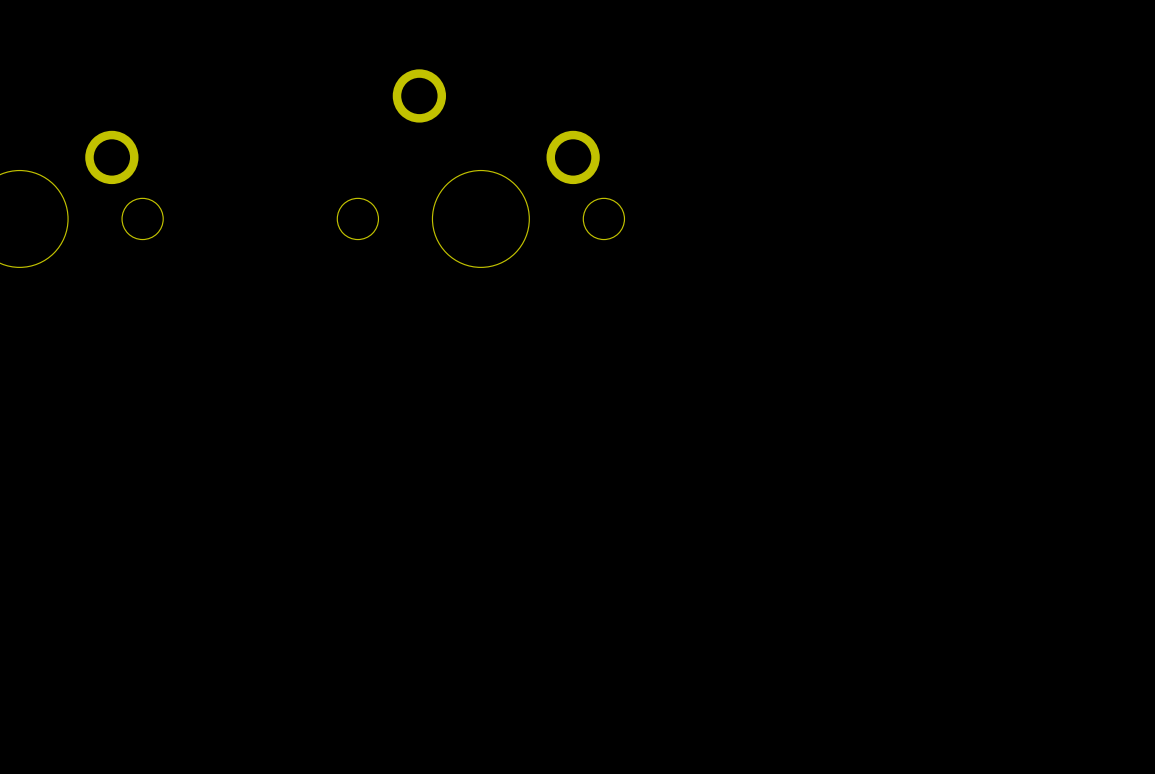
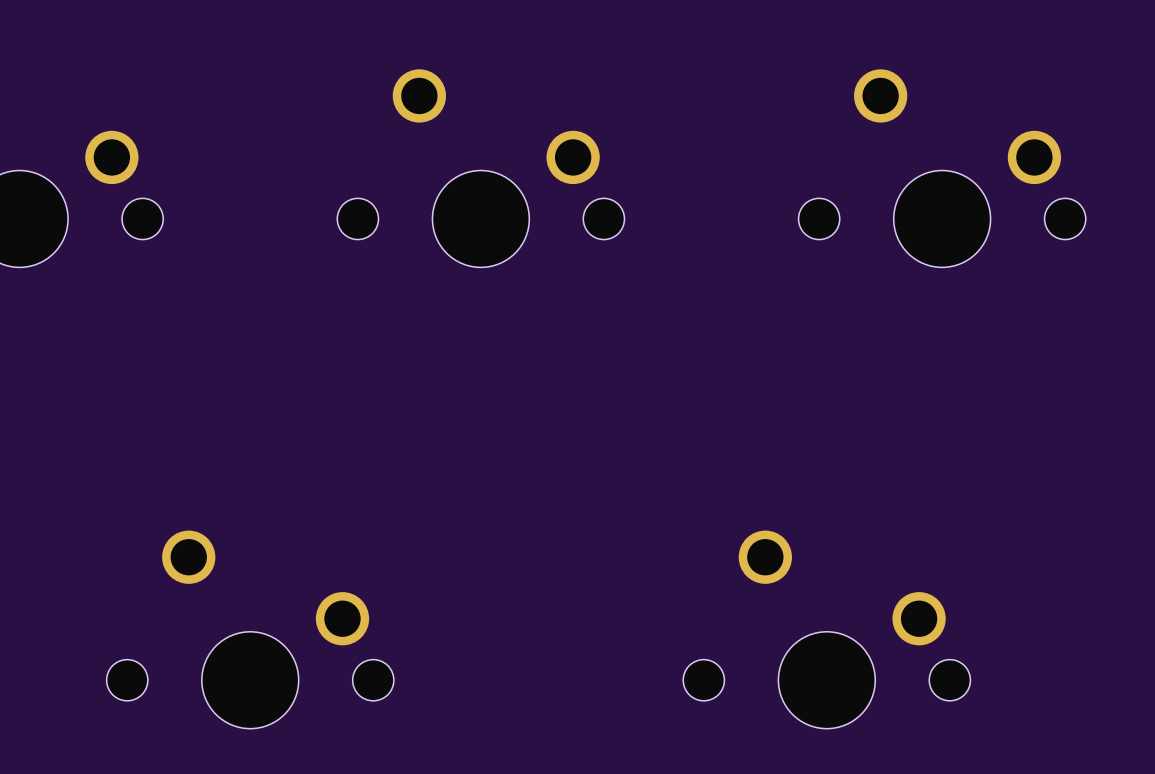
part: none -> (942, 168)
part: none -> (250, 629)
part: none -> (826, 629)

